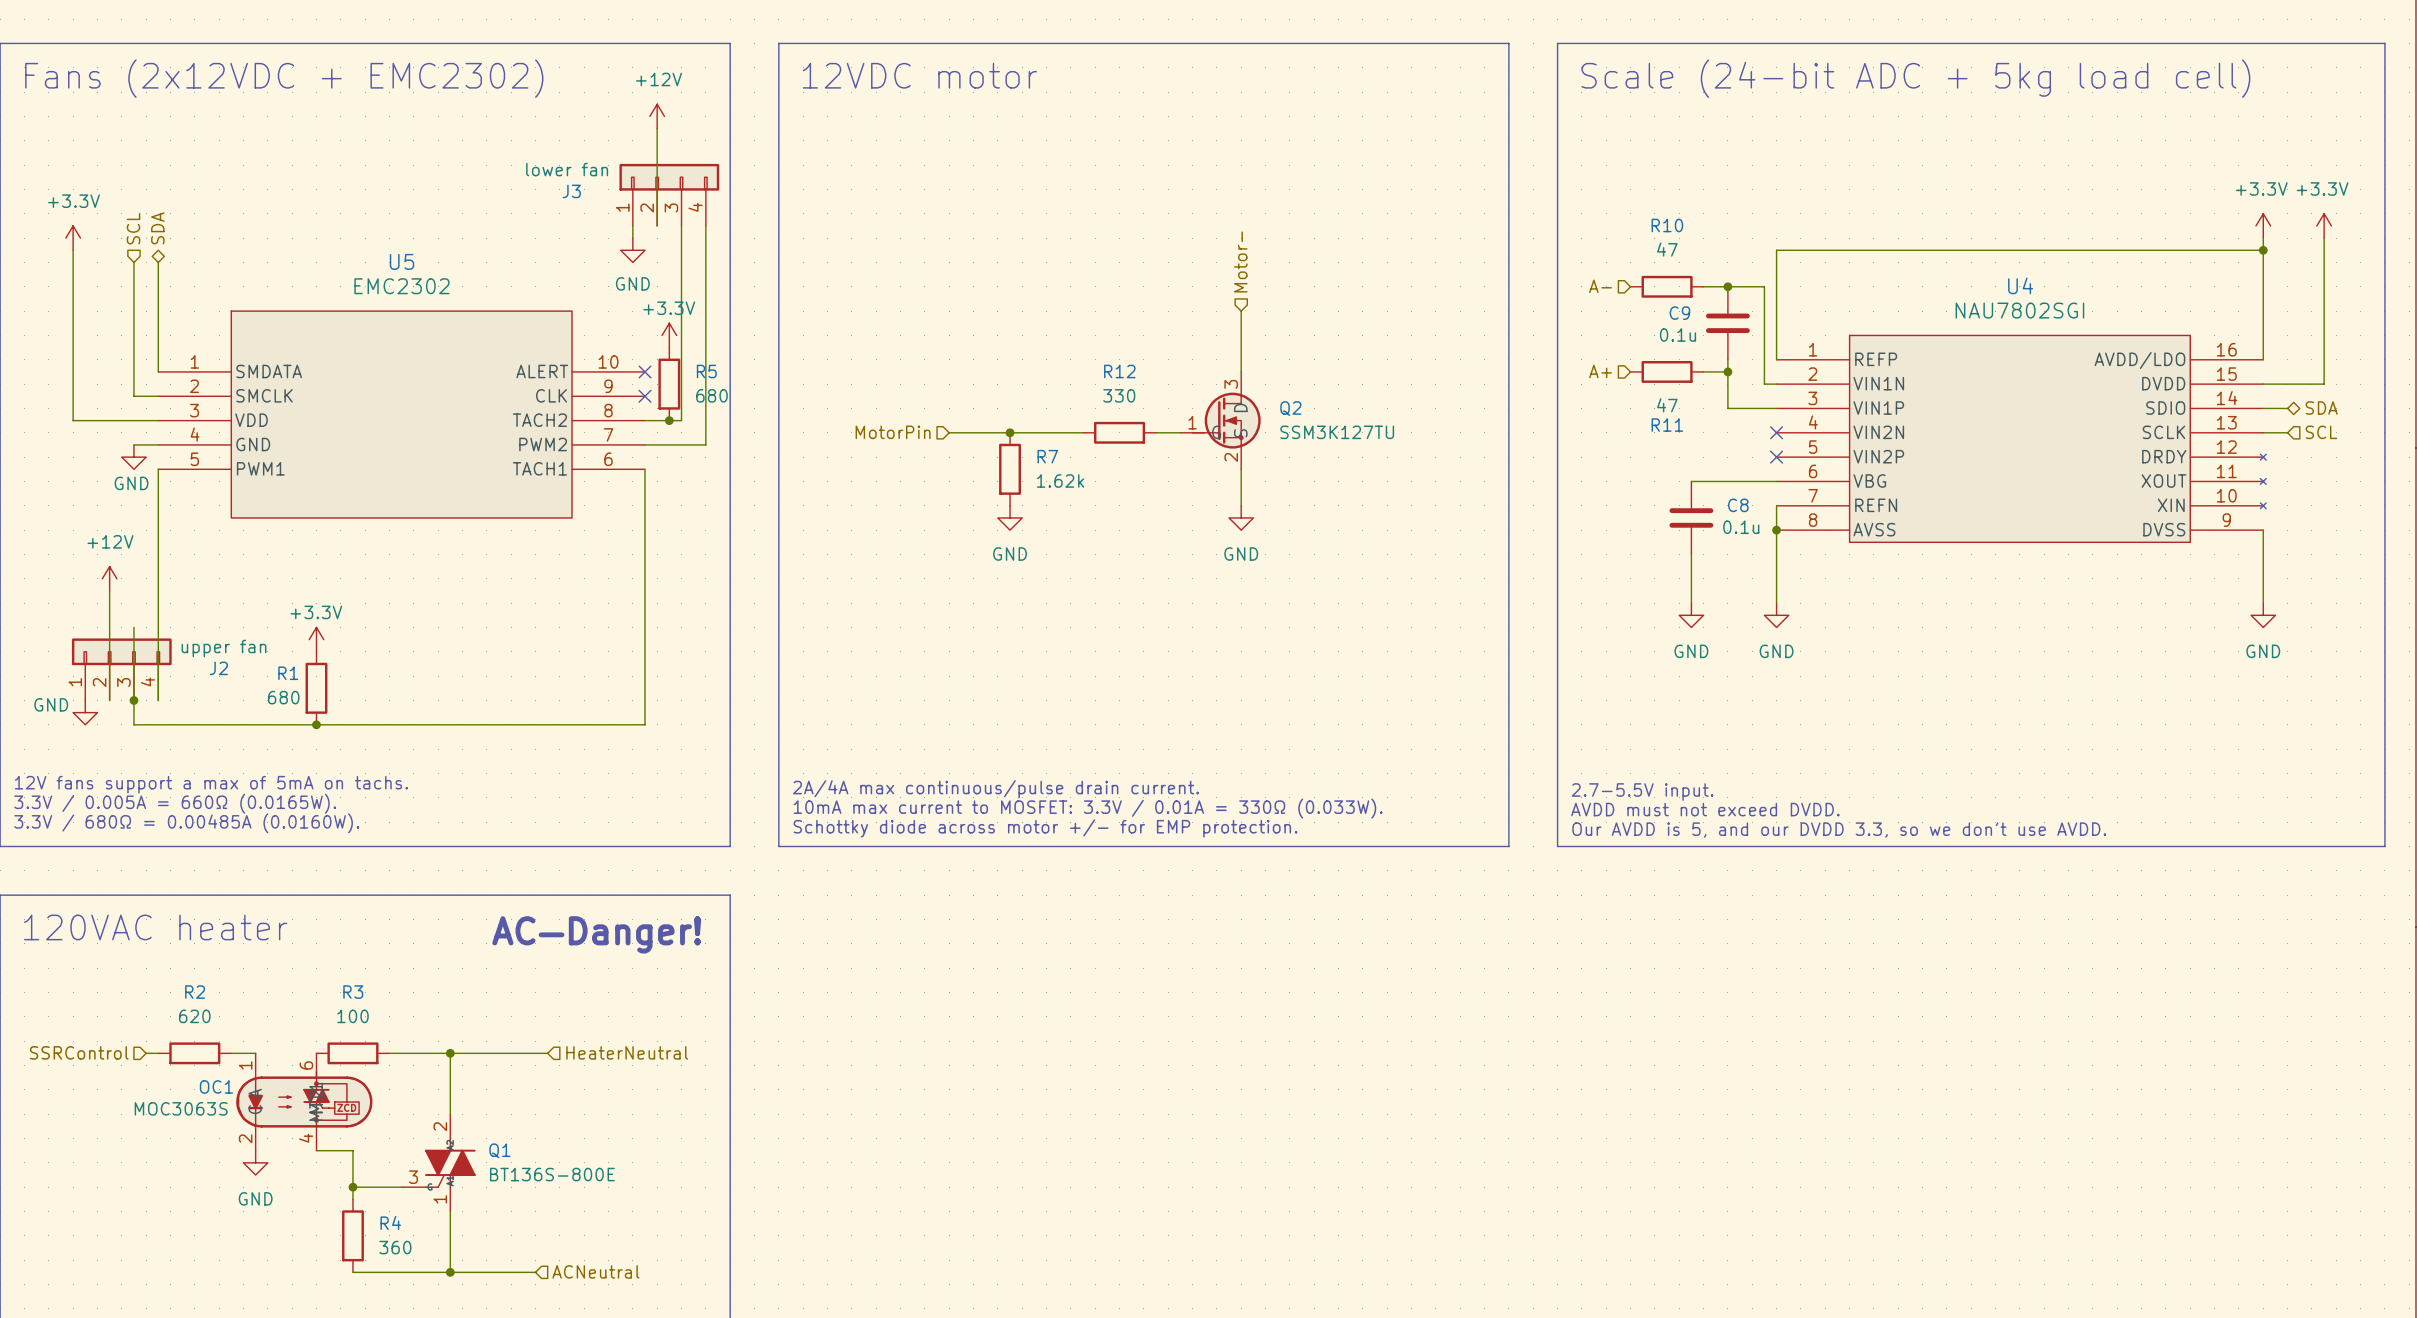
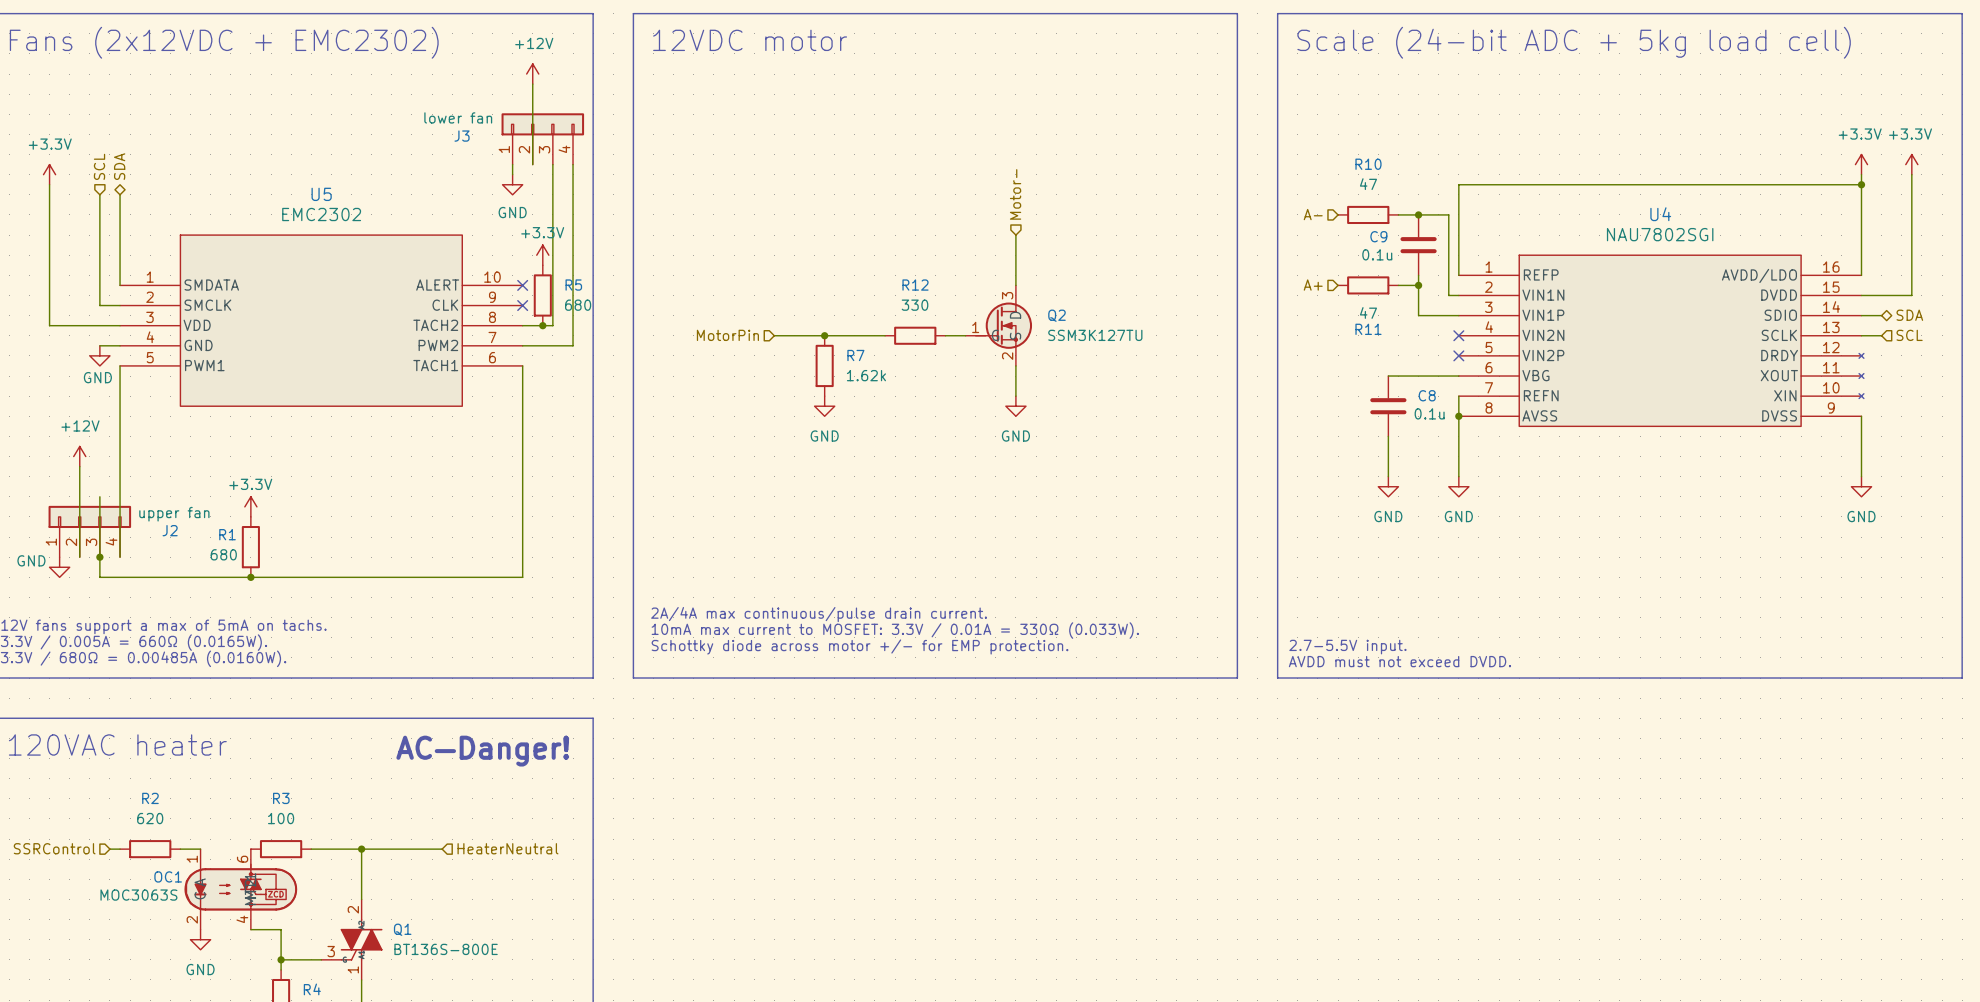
text: none -> 2A/4A max continuous/pulse drain current. (819, 614)
text: 2A/4A max continuous/pulse drain current. (995, 789) -> 10mA max current to MOSFET: 3.3V / 0.01A = 330Ω (0.033W). (895, 630)
text: 2.7-5.5V input. (1642, 792) -> none
text: 10mA max current to MOSFET: 3.3V / 0.01A = 330Ω (0.033W). (1088, 808) -> Schottky diode across motor +/- for EMP protection. (860, 646)
text: AVDD must not exceed DVDD. (1705, 809) -> 2.7-5.5V input. (1347, 647)
text: Schottky diode across motor +/- for EMP protection. (1045, 828) -> none
text: Our AVDD is 5, and our DVDD 3.3, so we don't use AVDD. (1839, 830) -> AVDD must not exceed DVDD. (1399, 661)

